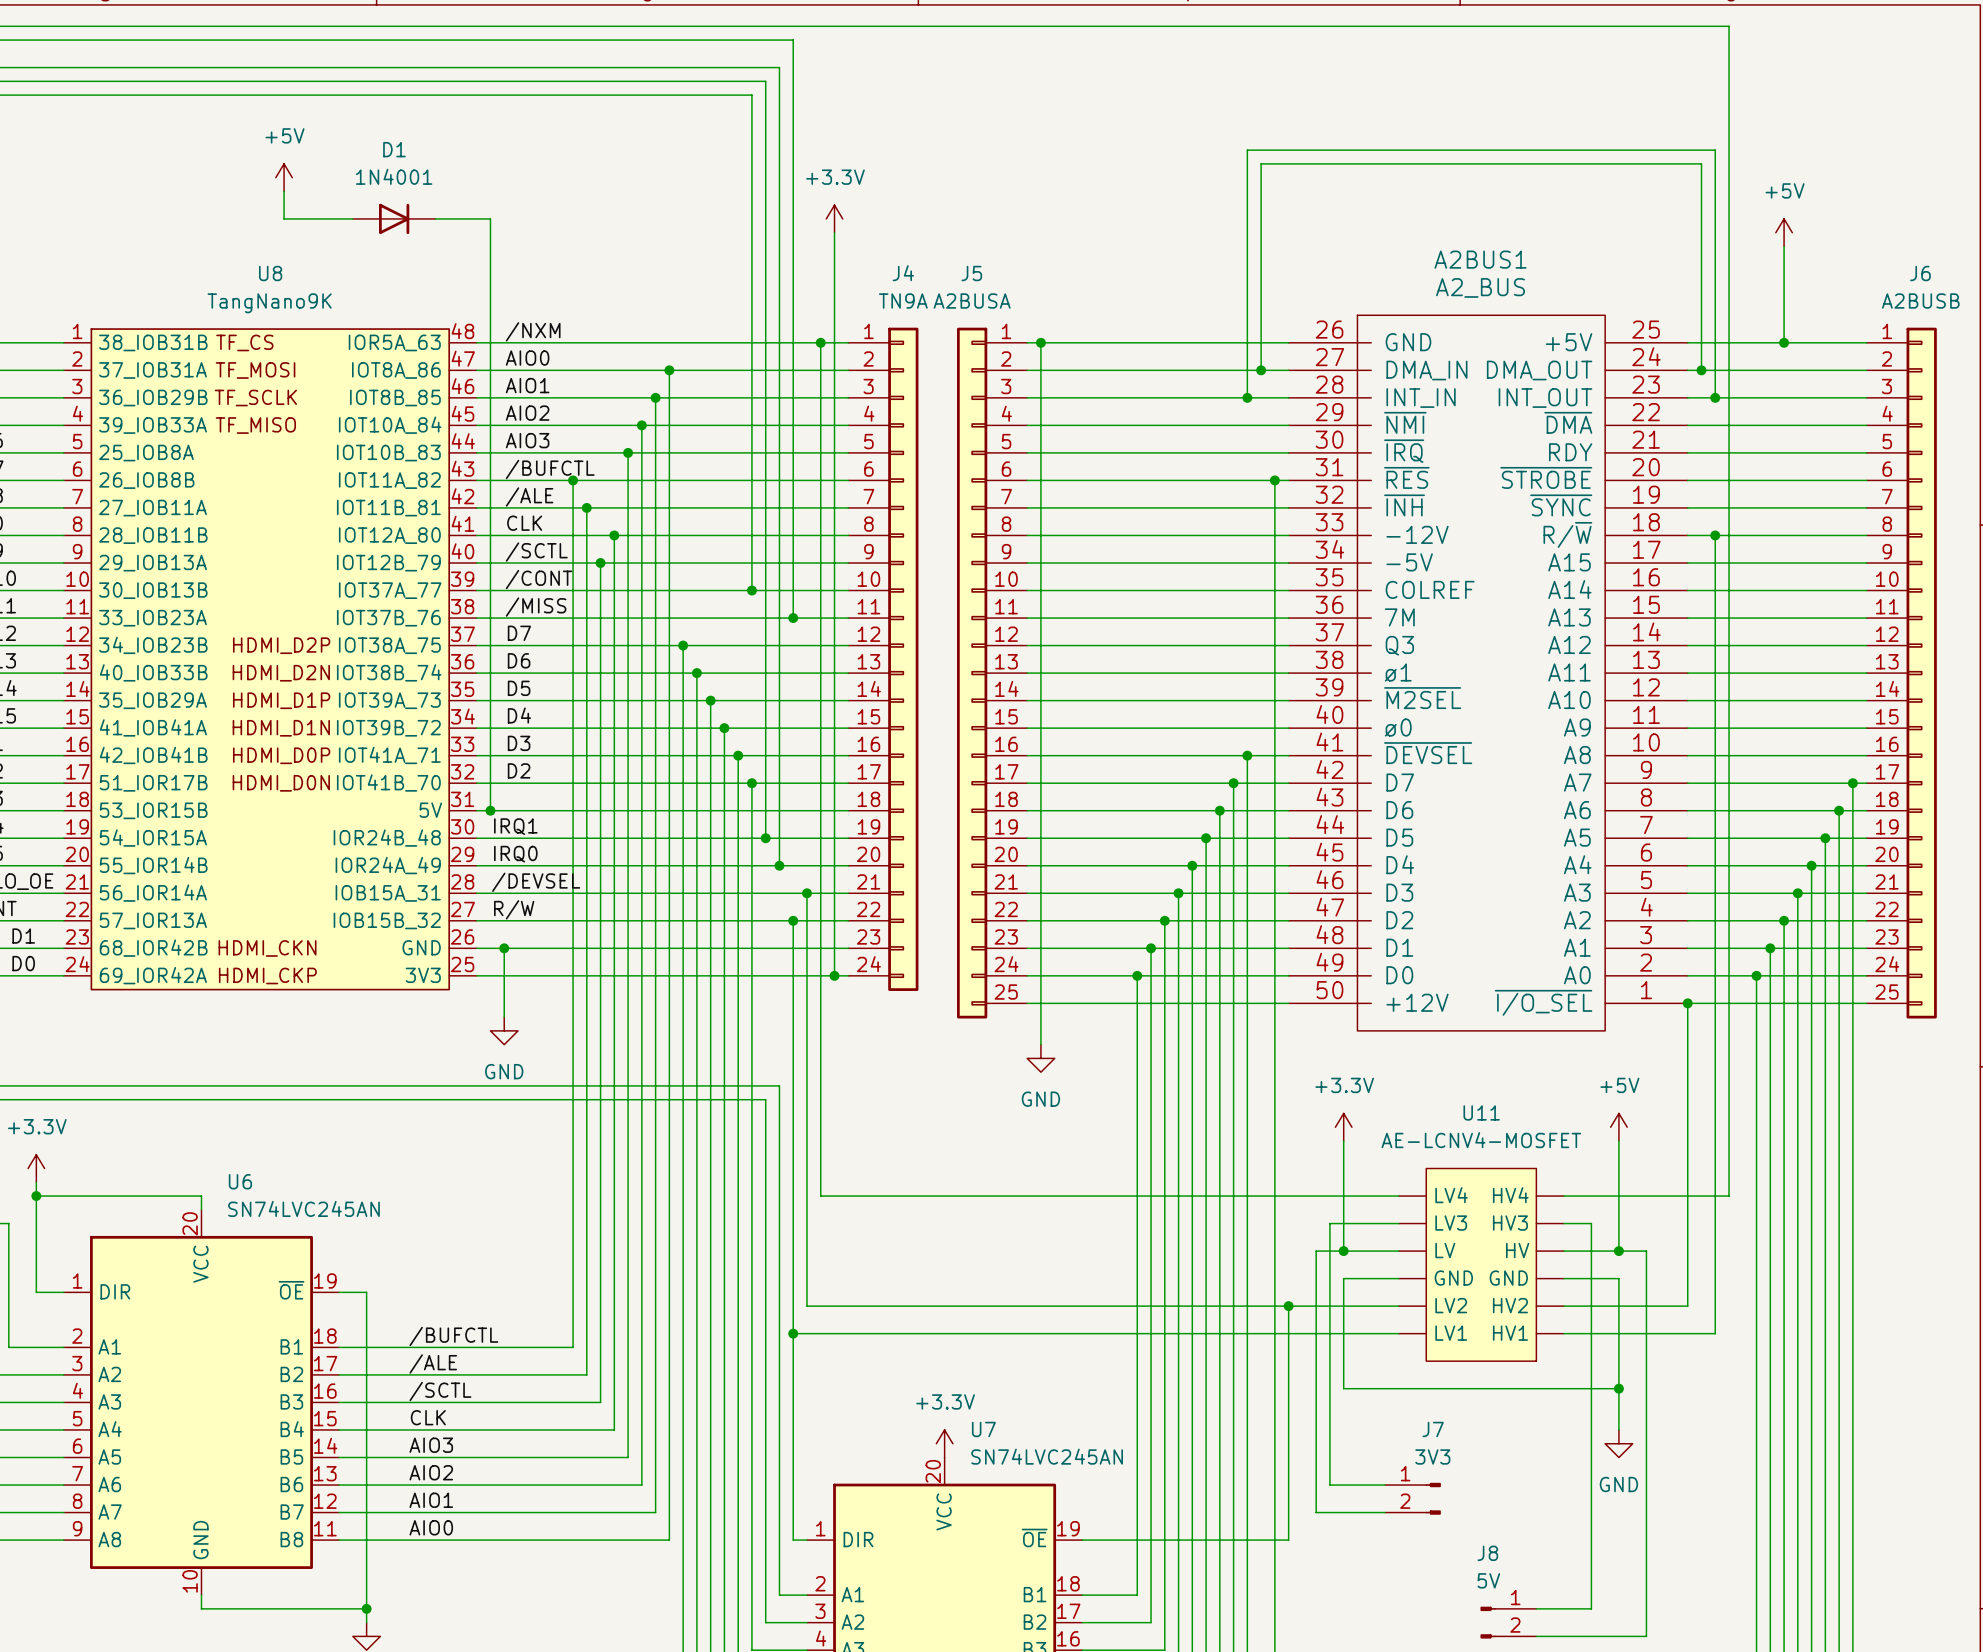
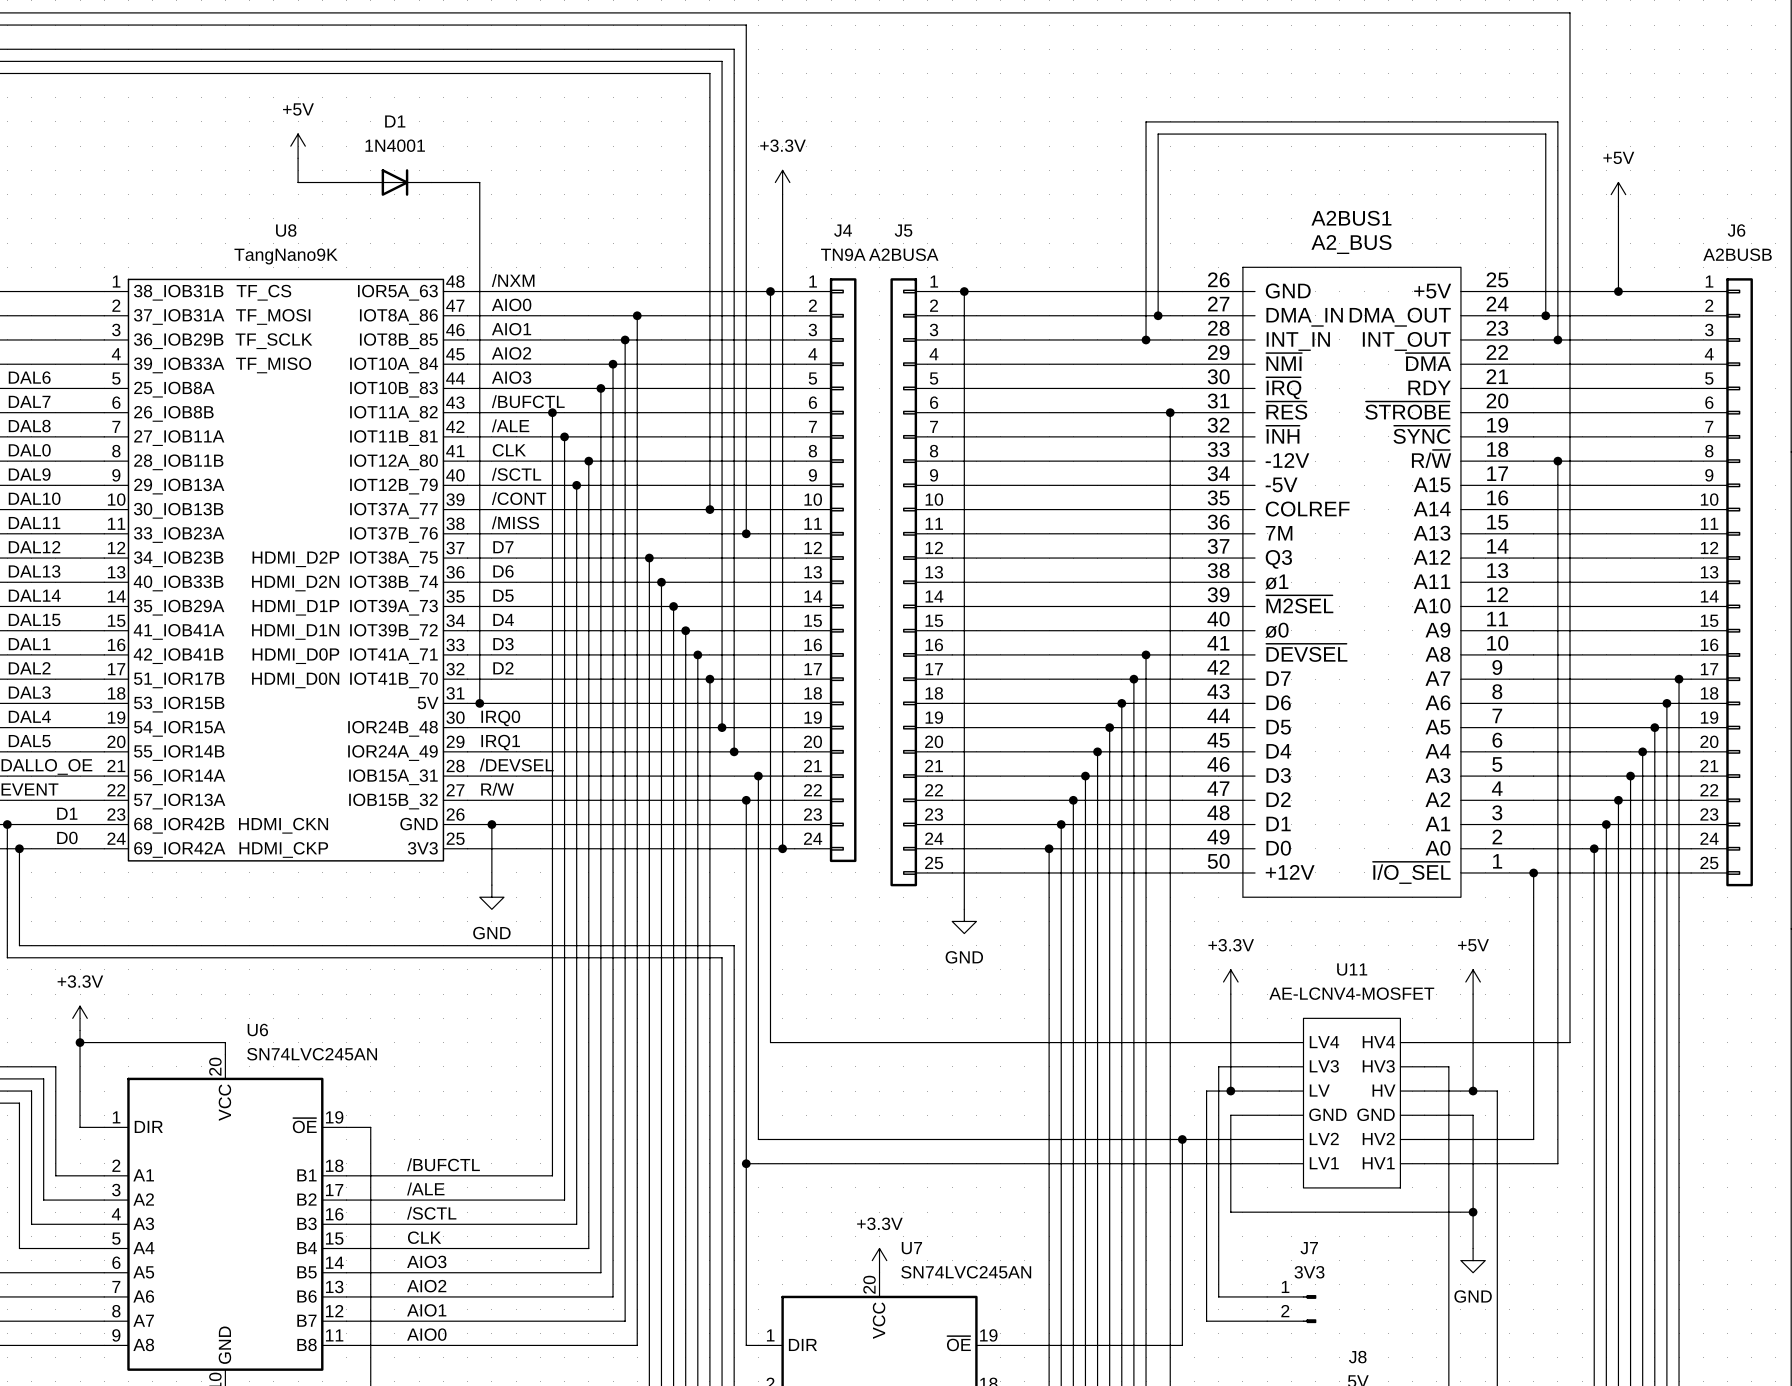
label: IRQ1 (515, 826) -> IRQ0 (500, 718)
label: IRQ0 (515, 854) -> IRQ1 (500, 742)

